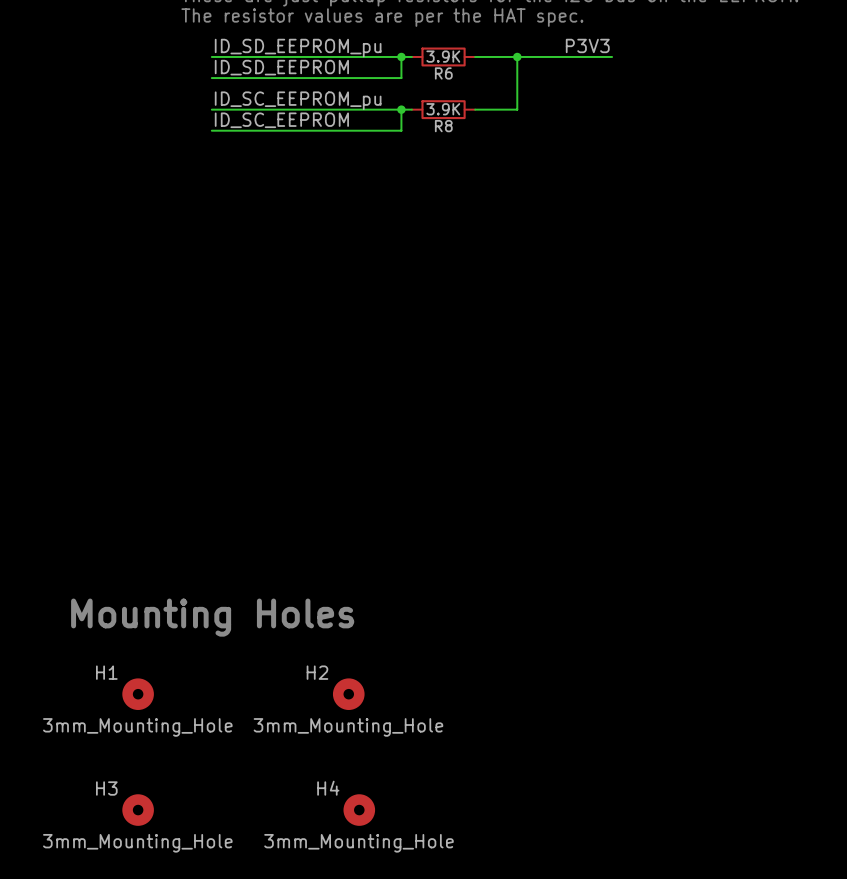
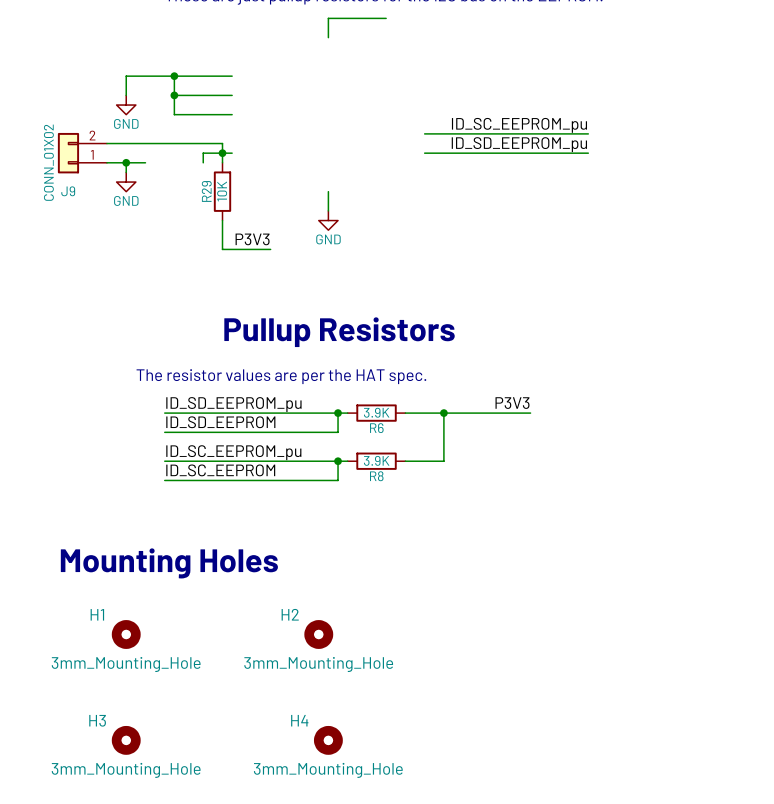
text: The resistor values are per the HAT spec. (382, 17) -> none
wire: none -> (386, 18) (328, 18) (328, 37)
label: P3V3 (587, 45) -> none
label: ID_SD_EEPROM_pu (298, 48) -> none
wire: (211, 56) (411, 56) -> none
wire: (401, 56) (401, 78) (211, 78) -> none
junction: (401, 56) -> none
R6 position: (443, 56) -> (376, 413)
wire: (475, 56) (612, 56) -> none
wire: (517, 56) (517, 109) (475, 109) -> none
junction: (517, 56) -> none
label: ID_SD_EEPROM (281, 67) -> none
wire: none -> (174, 76) (174, 114) (232, 114)
junction: none -> (174, 76)
wire: none -> (232, 76) (126, 76) (126, 95)
label: ID_SC_EEPROM_pu (298, 100) -> none
wire: none -> (174, 95) (232, 95)
junction: none -> (174, 95)
wire: (211, 109) (411, 109) -> none
wire: (401, 109) (401, 130) (211, 130) -> none
junction: (401, 109) -> none
R8 position: (443, 109) -> (376, 461)
power symbol: none -> GND (126, 105)
label: ID_SC_EEPROM (281, 120) -> none
label: none -> ID_SC_EEPROM_pu (519, 125)
wire: none -> (424, 133) (588, 133)
wire: none -> (106, 143) (222, 143) (222, 162)
label: none -> ID_SD_EEPROM_pu (519, 144)
J9: none -> CONN_01X02 (82, 153)
junction: none -> (222, 153)
wire: none -> (232, 153) (203, 153) (203, 162)
wire: none -> (424, 153) (588, 153)
wire: none -> (106, 162) (145, 162)
wire: none -> (126, 162) (126, 172)
junction: none -> (126, 162)
power symbol: none -> GND (126, 182)
R29: none -> 10K (222, 191)
wire: none -> (328, 191) (328, 210)
wire: none -> (222, 220) (222, 249) (270, 249)
power symbol: none -> GND (328, 220)
label: none -> P3V3 (252, 239)
text: none -> Pullup Resistors (339, 332)
text: none -> The resistor values are per the HAT spec. (281, 376)
label: none -> P3V3 (512, 403)
label: none -> ID_SD_EEPROM_pu (233, 404)
wire: none -> (164, 413) (347, 413)
wire: none -> (338, 413) (338, 432) (164, 432)
junction: none -> (338, 413)
wire: none -> (405, 413) (530, 413)
wire: none -> (443, 413) (443, 461) (405, 461)
junction: none -> (443, 413)
label: none -> ID_SD_EEPROM (220, 422)
label: none -> ID_SC_EEPROM_pu (233, 452)
wire: none -> (164, 461) (347, 461)
wire: none -> (338, 461) (338, 480) (164, 480)
junction: none -> (338, 461)
label: none -> ID_SC_EEPROM (220, 470)

